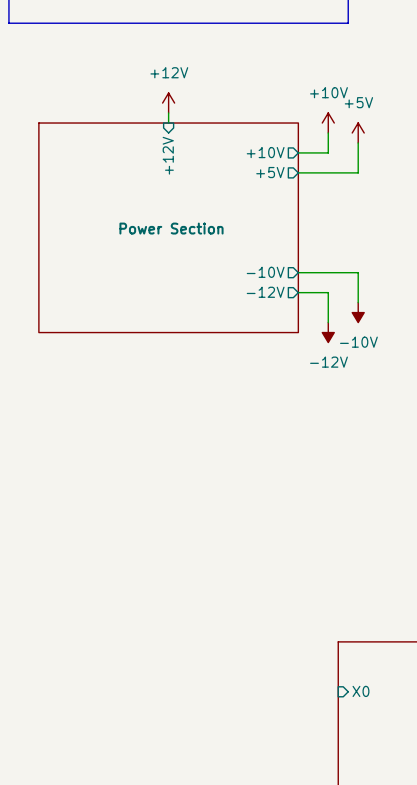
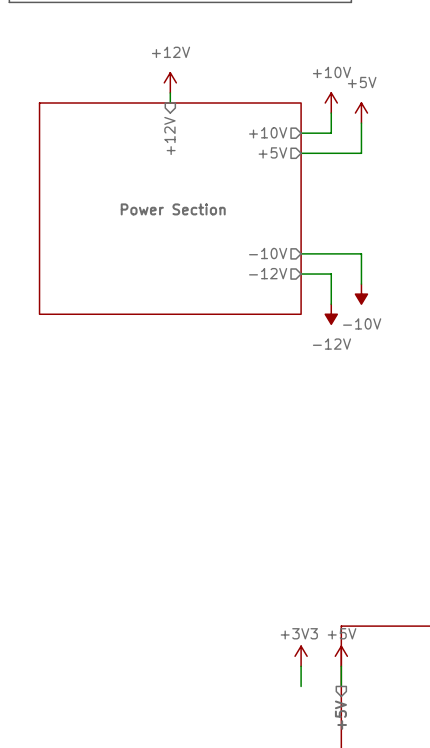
power symbol: none -> +3V3 (301, 656)
power symbol: none -> +5V (341, 656)
wire: none -> (301, 666) (301, 686)
sheet pin: X0 (360, 691) -> none
sheet pin: none -> +5V (340, 715)

